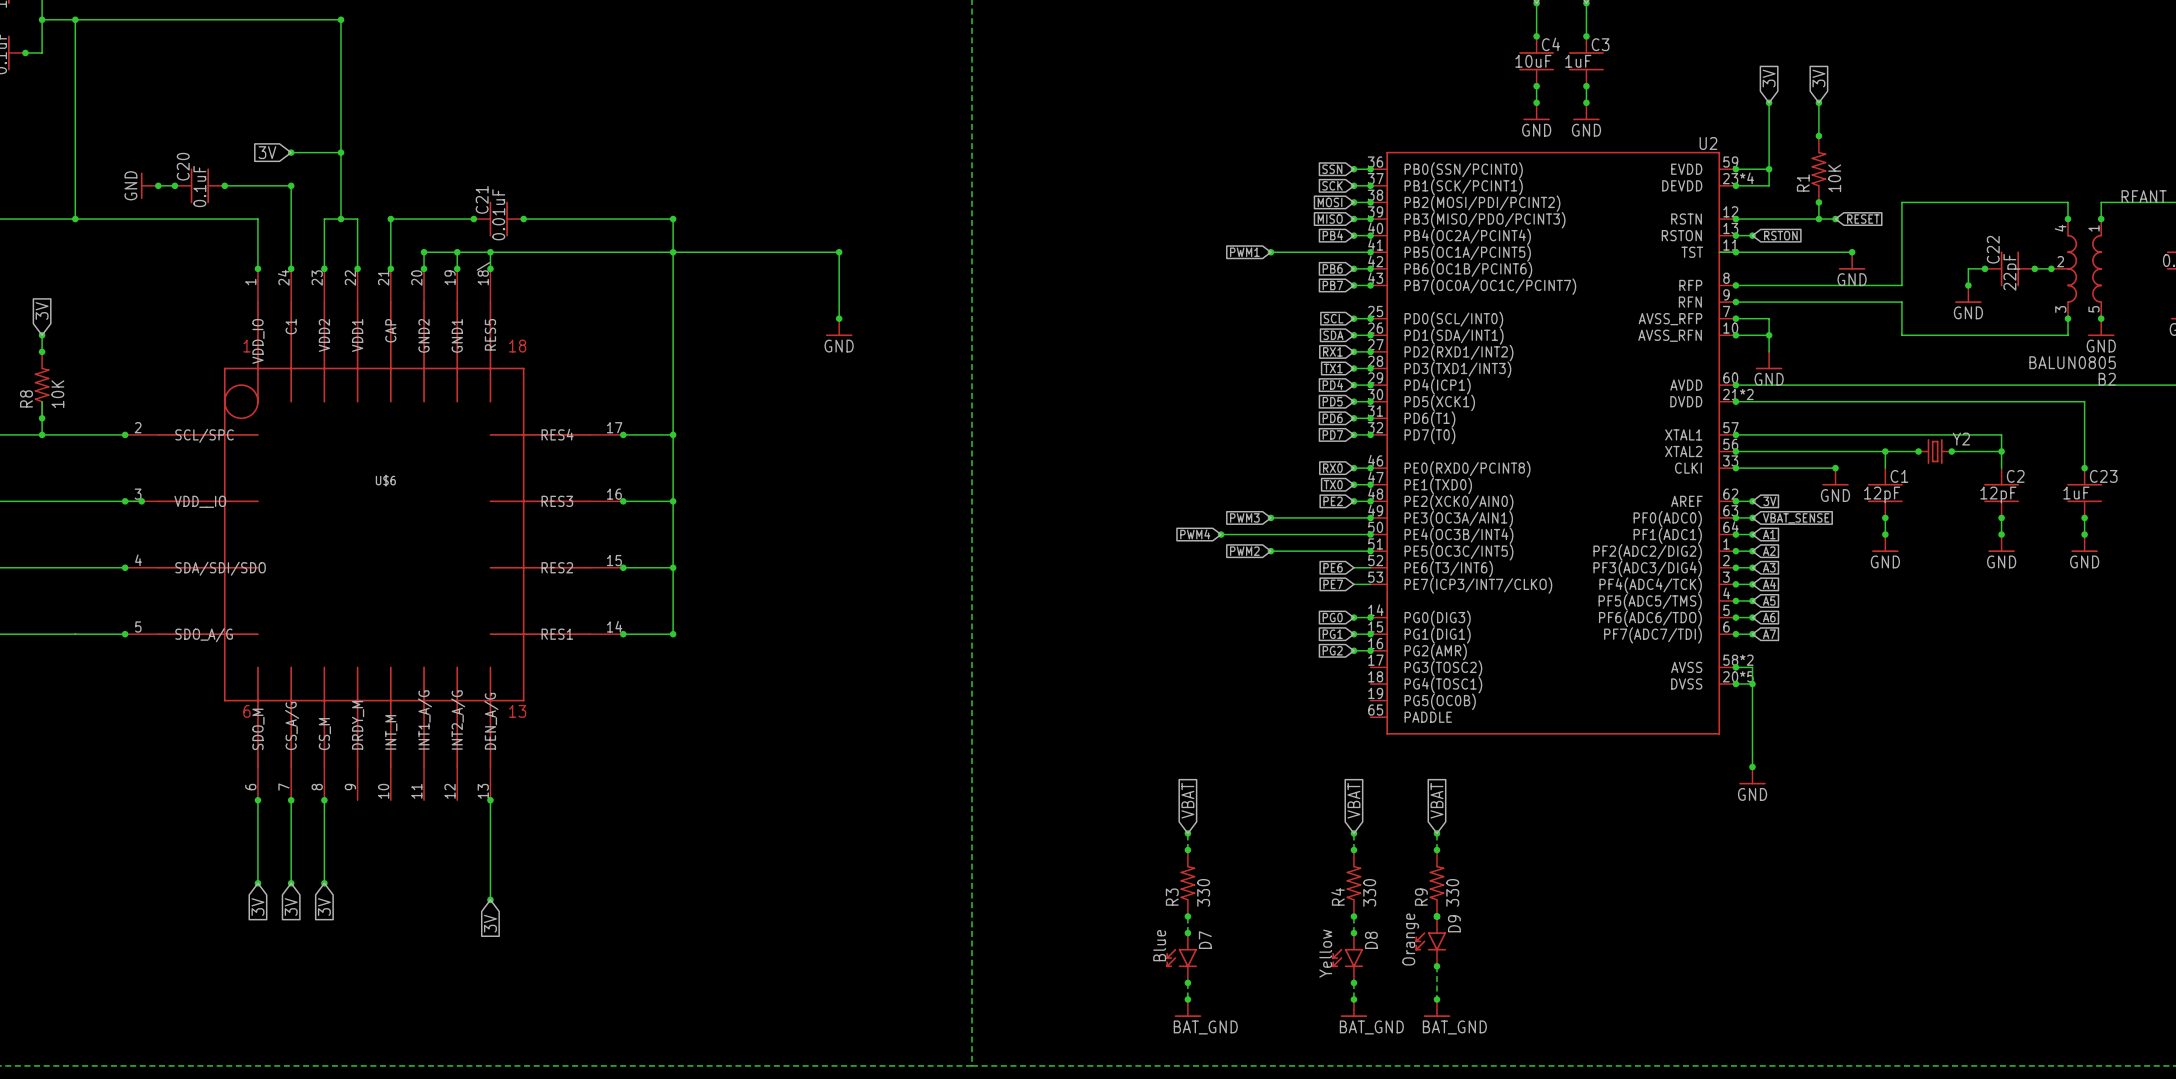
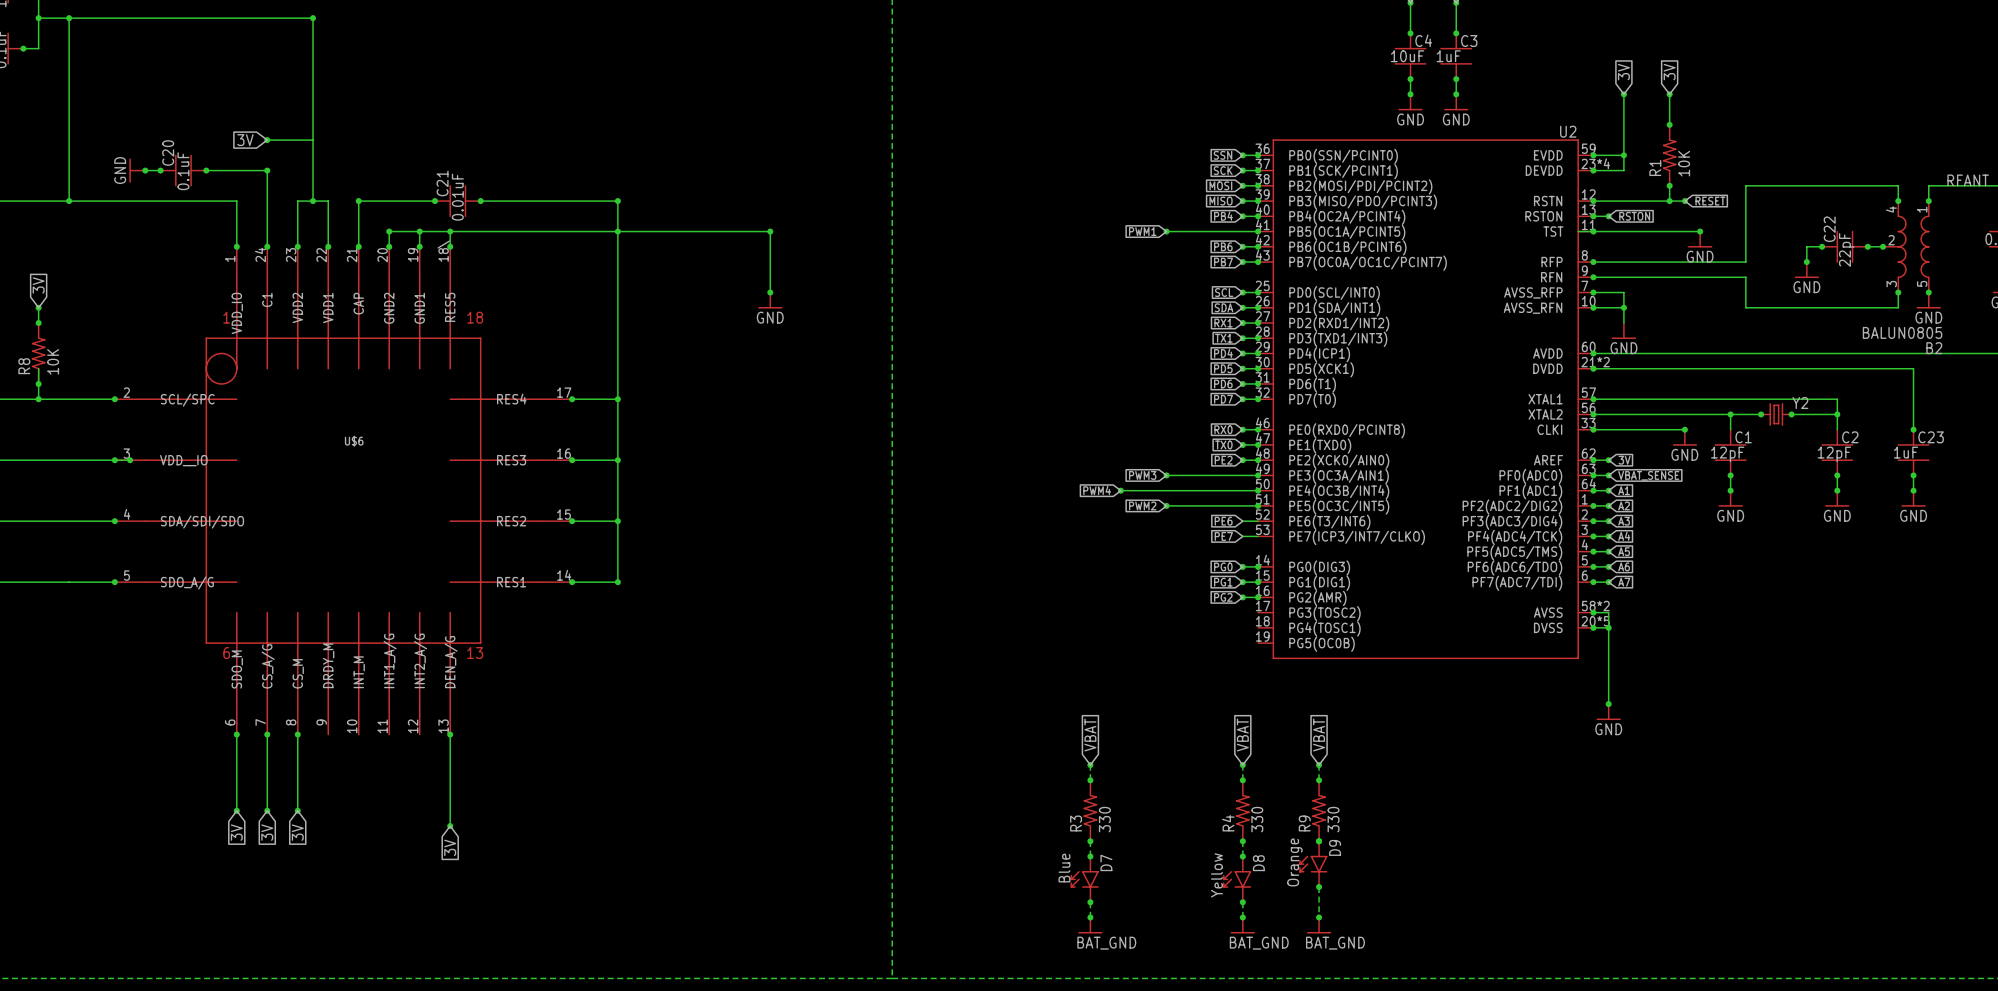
U2 symbol: [1370, 151, 1736, 735] -> [1258, 139, 1594, 660]
junction: (340, 152) -> none

